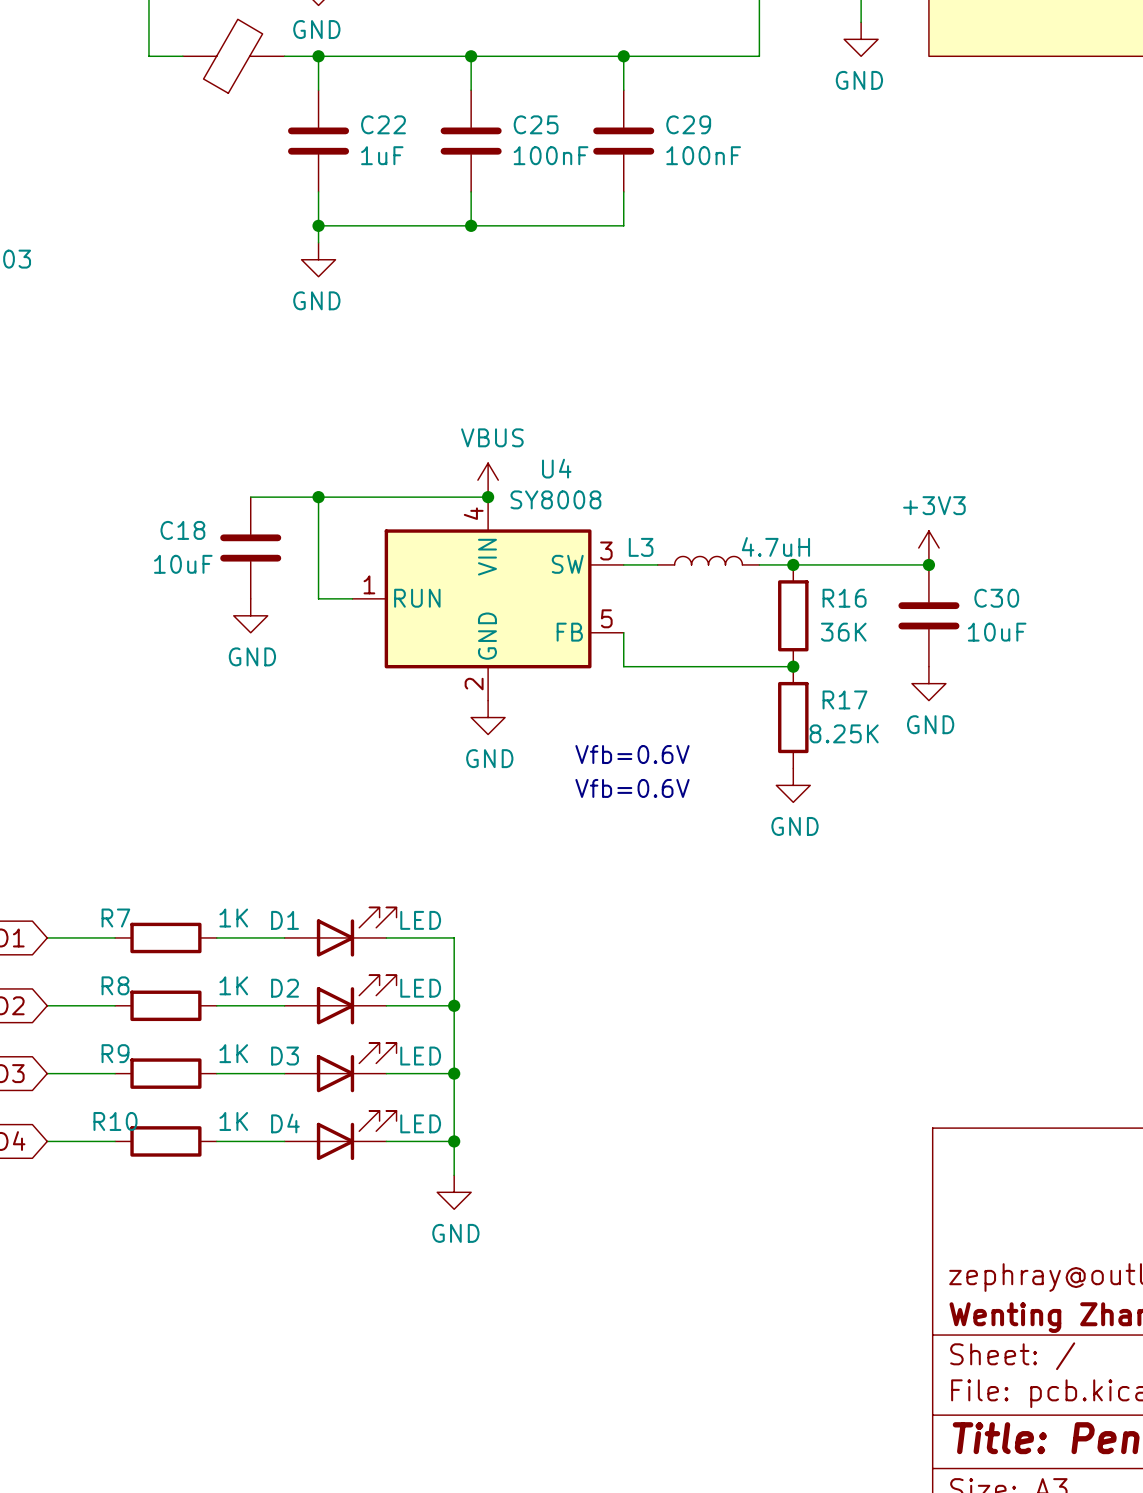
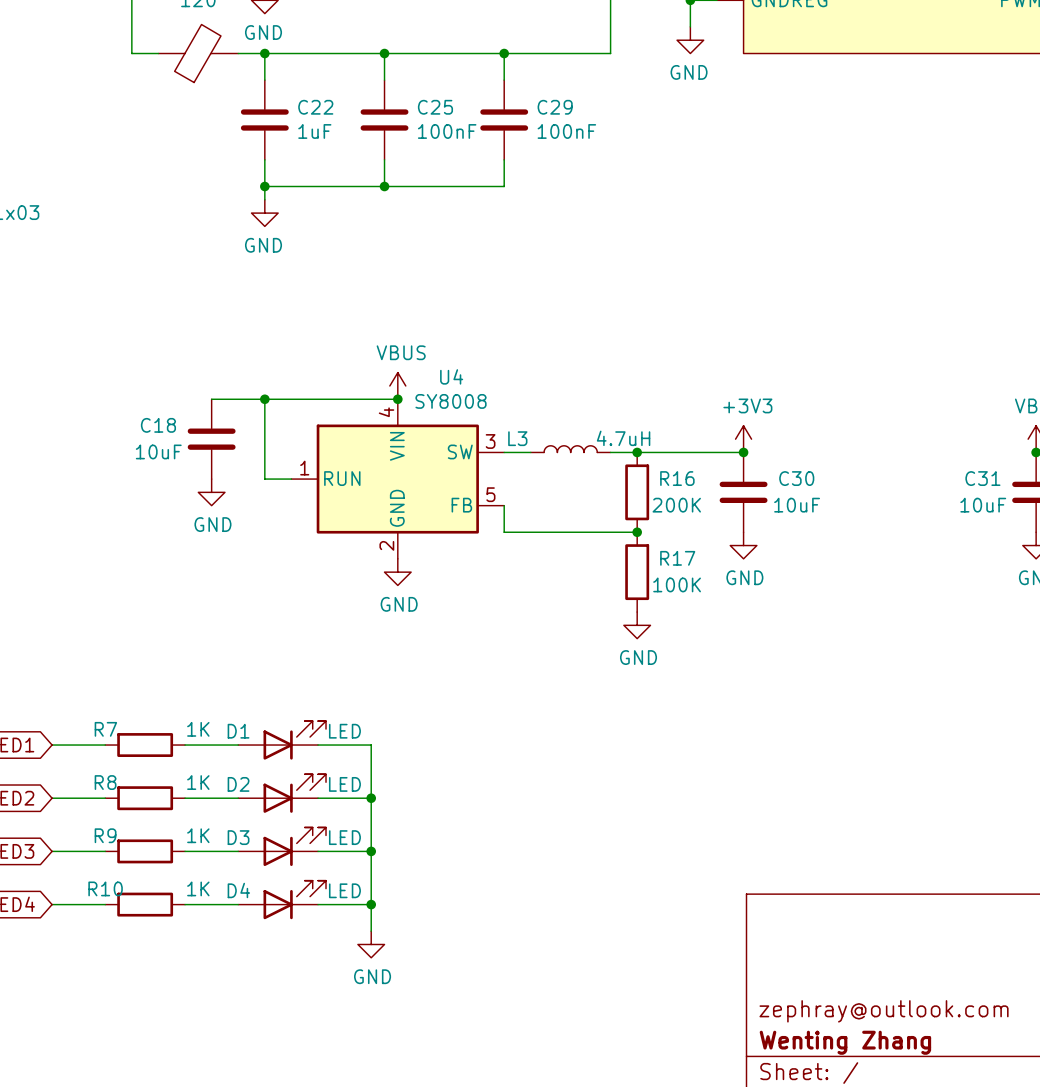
R16 value: 36K (843, 632) -> 200K (676, 505)
R17 value: 8.25K (844, 733) -> 100K (677, 584)
text: Vfb=0.6V (632, 754) -> none
text: Vfb=0.6V (632, 788) -> none

